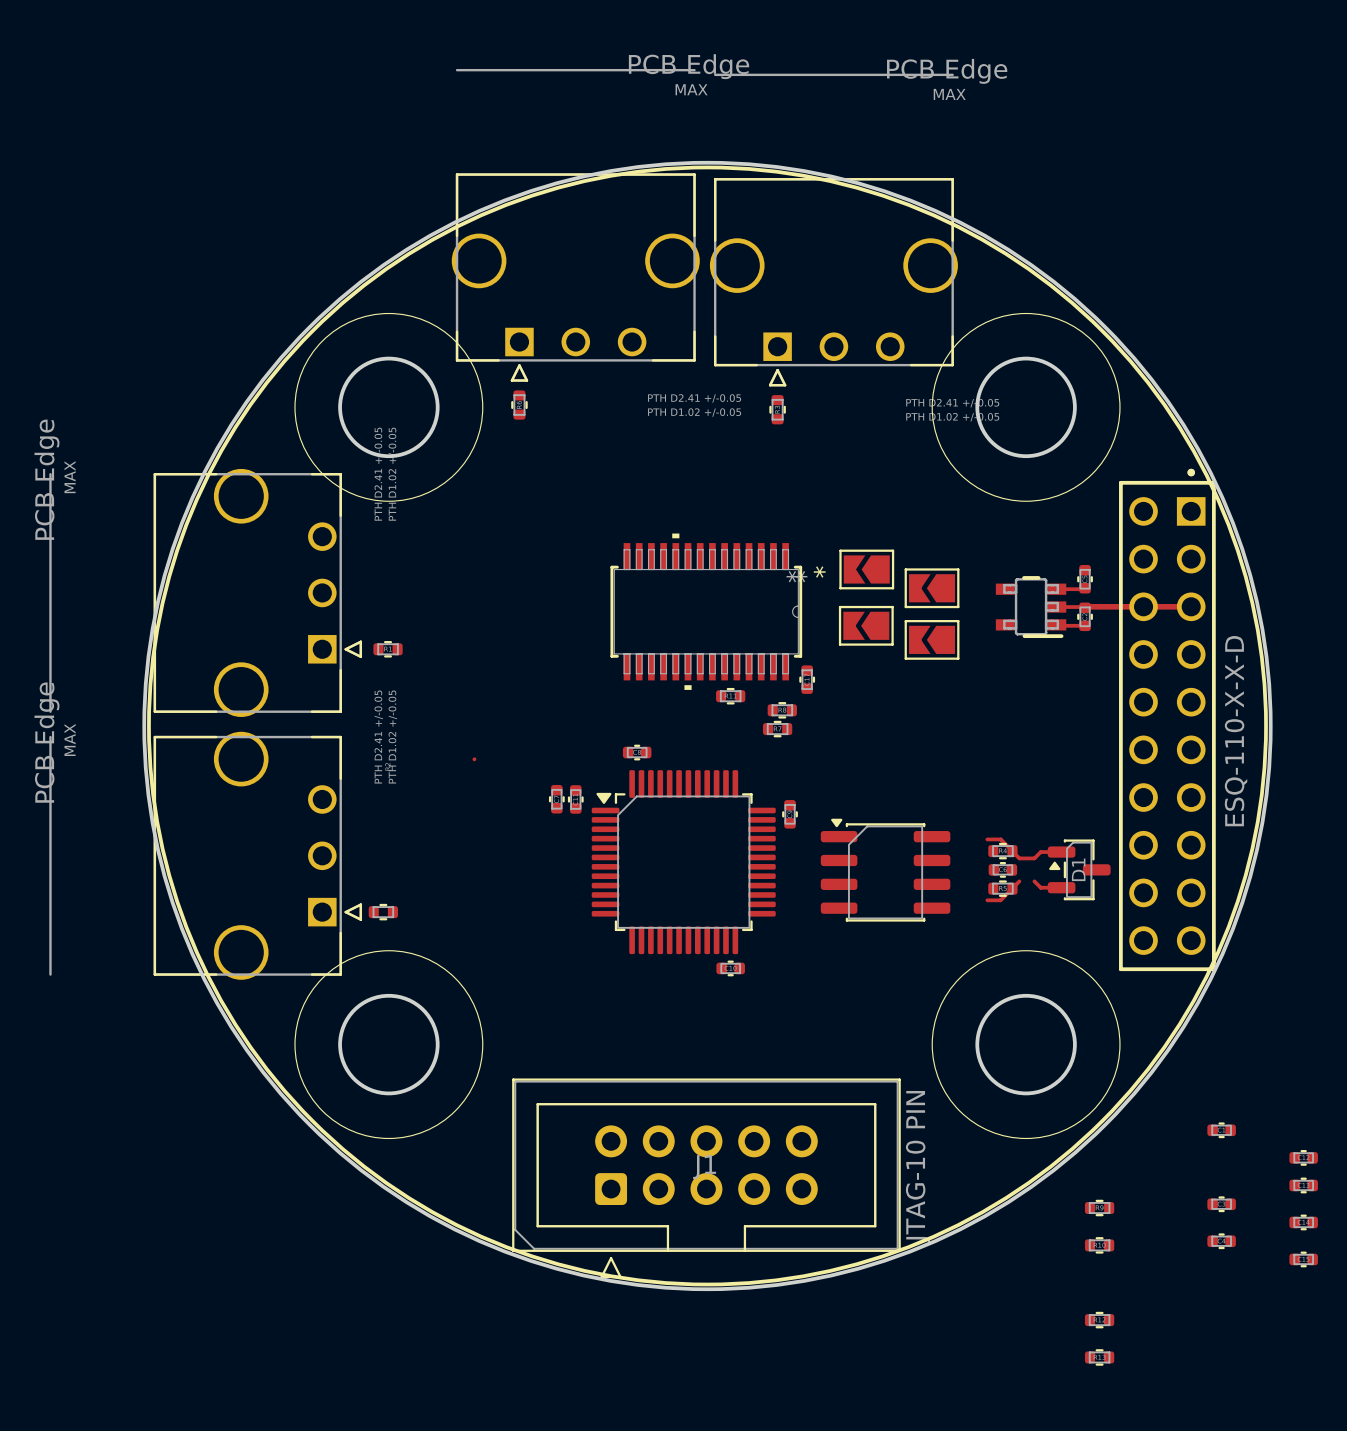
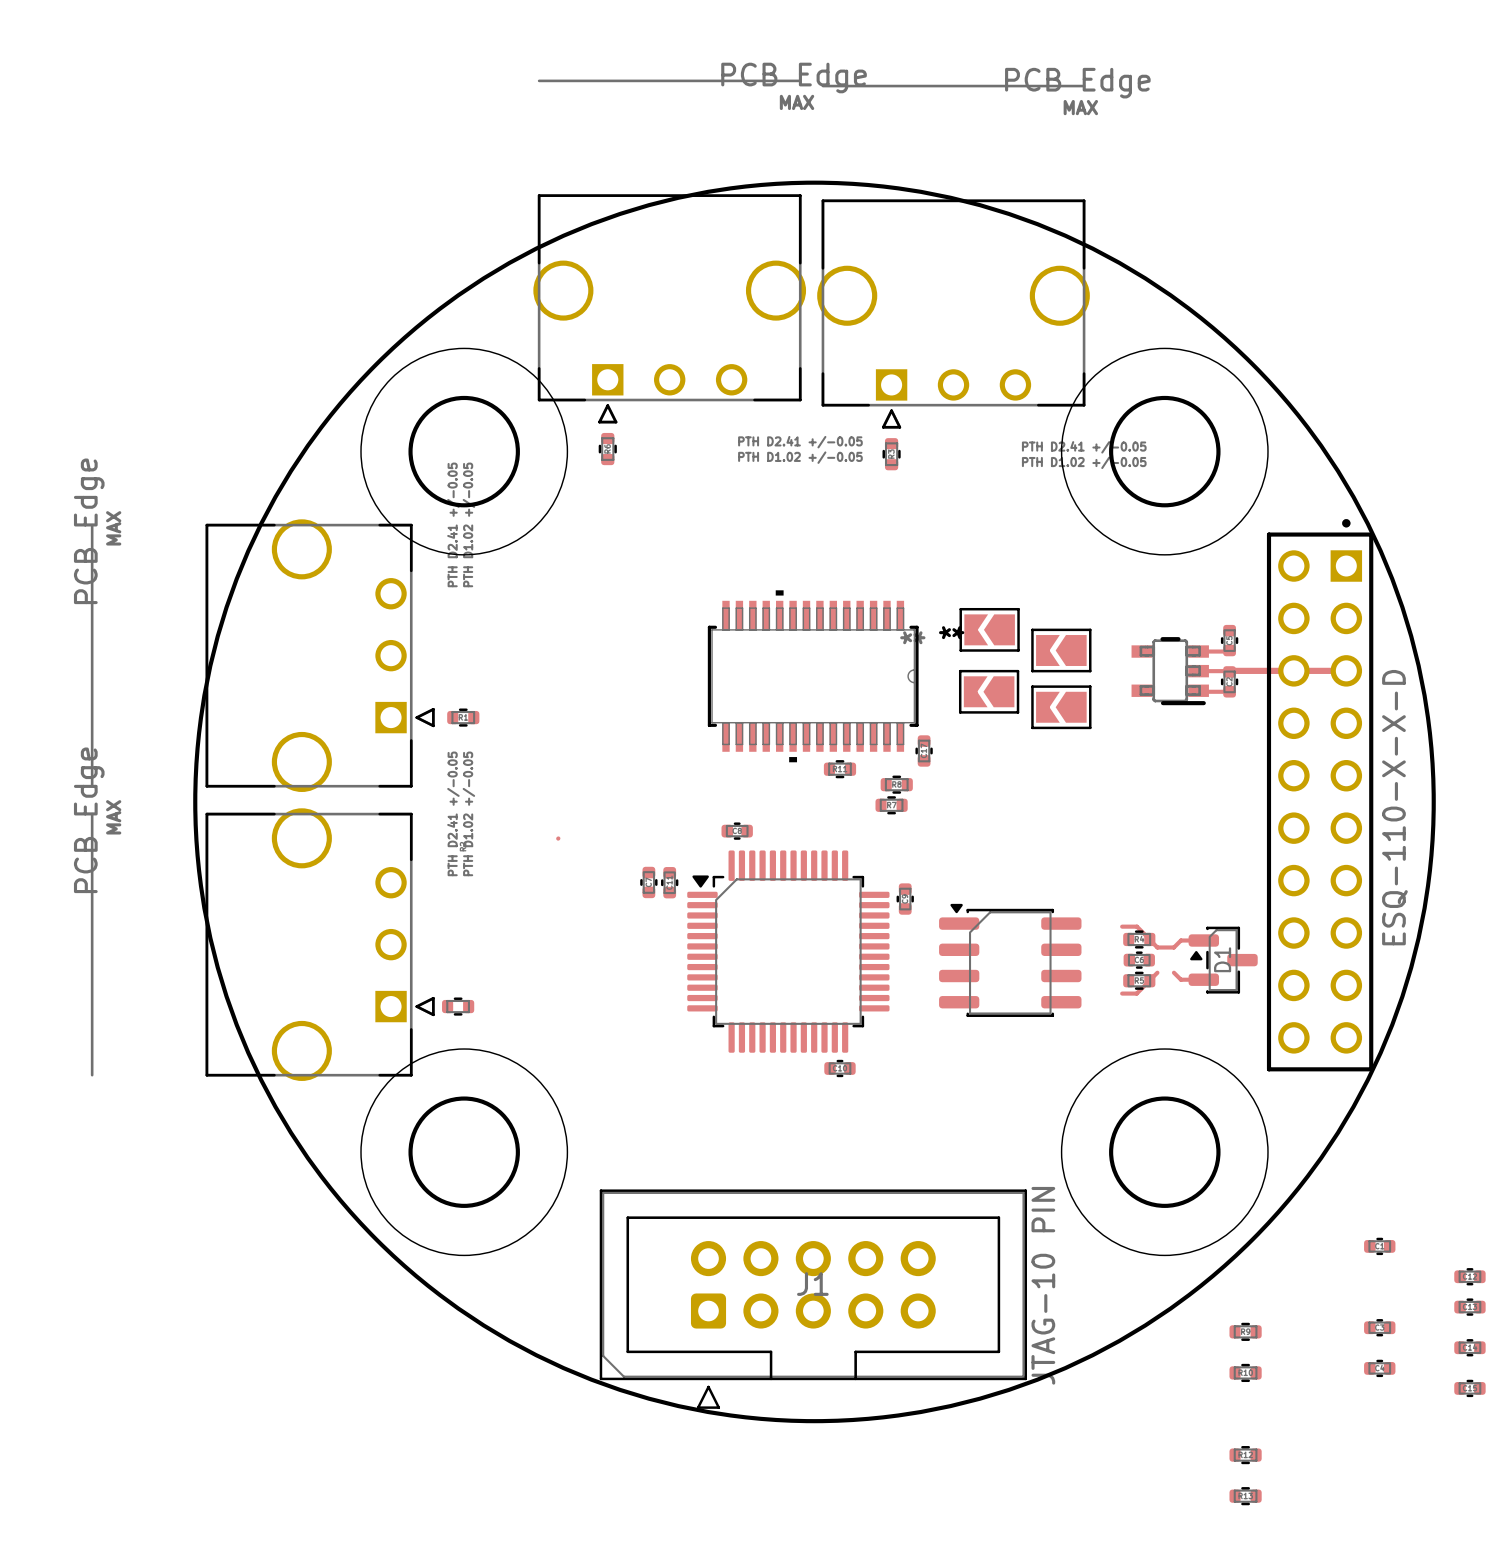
drawing: [147, 165, 1268, 1287] -> none
part footprint: [610, 533, 803, 690] -> [707, 590, 919, 763]

